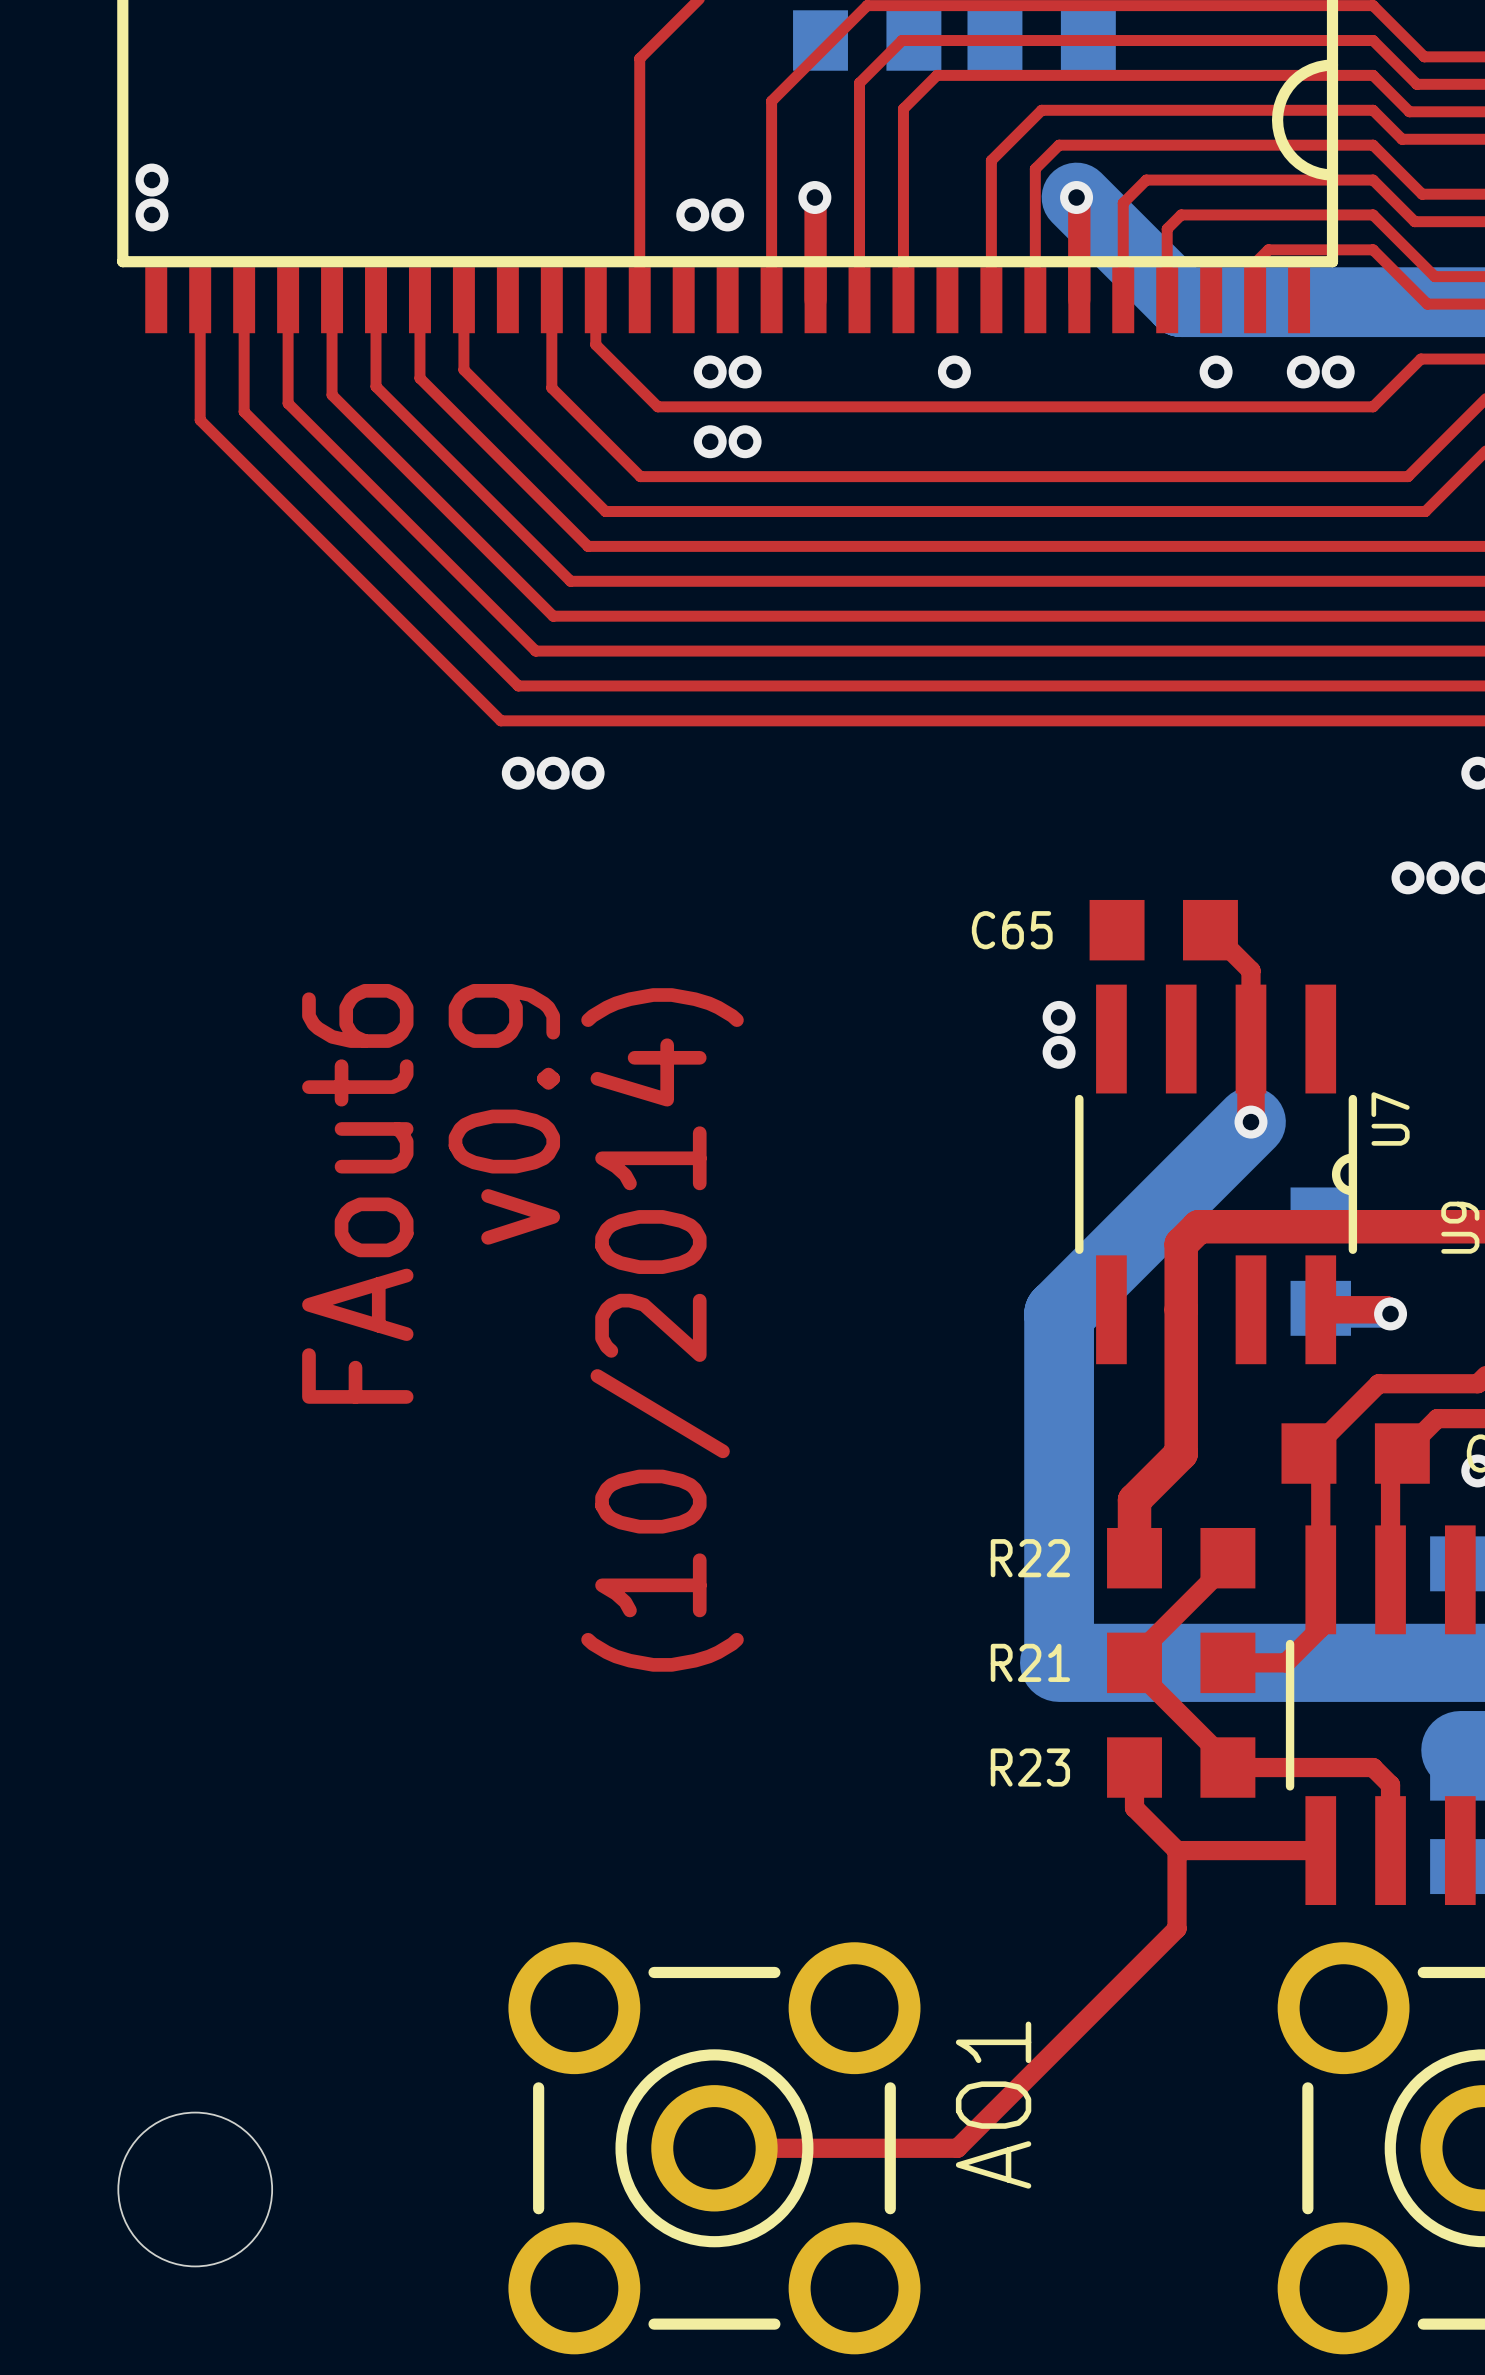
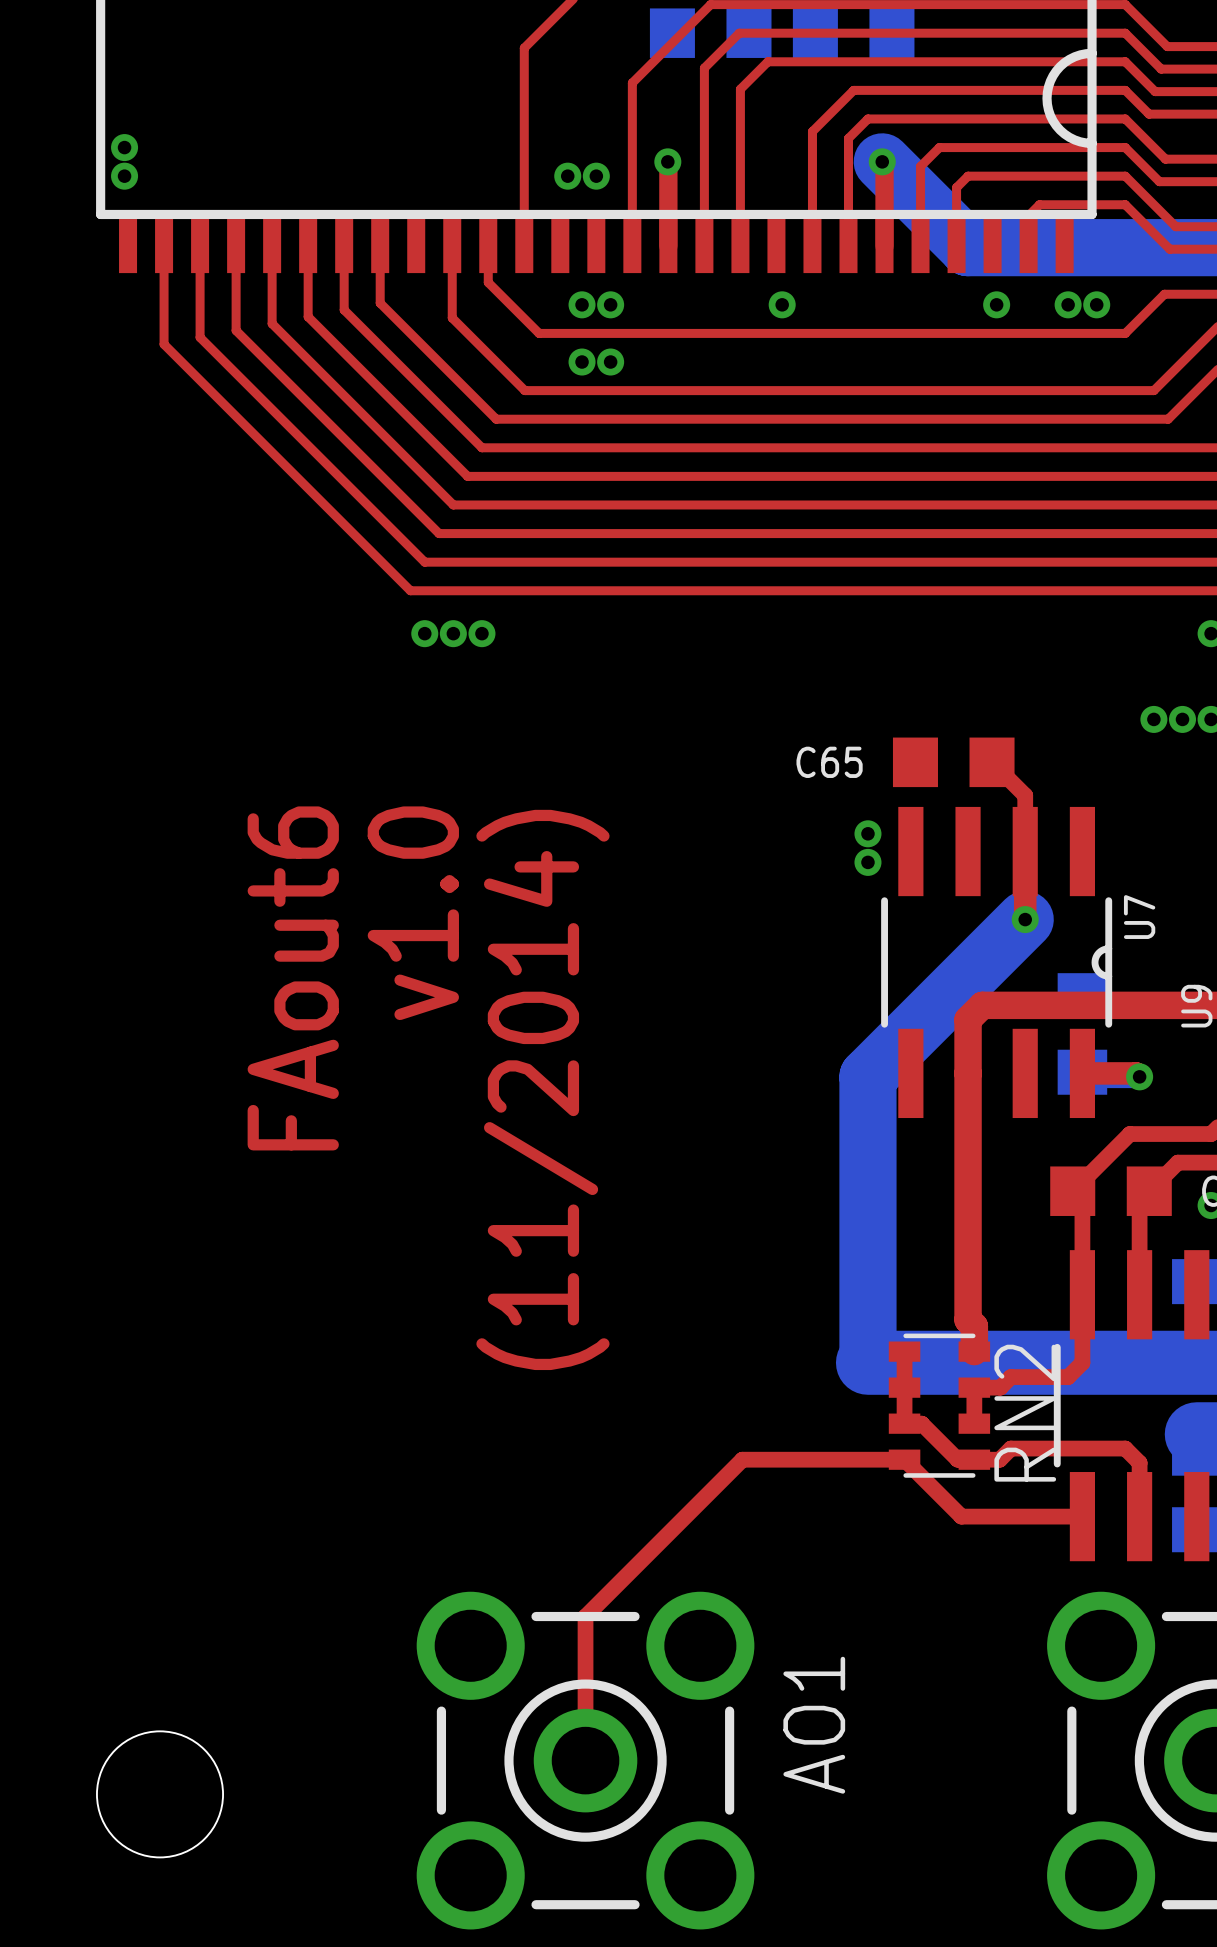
text: v0.9 (504, 1114) -> v1.0 (413, 913)
text: (10/2014) (662, 1329) -> (11/2014) (542, 1089)
top track: (1181, 1453) (1134, 1500) (1134, 1558) -> (968, 1191) (968, 1319) (974, 1326) (974, 1351)
R22: (1181, 1558) -> none
top track: (1227, 1558) (1227, 1563) (1134, 1657) (1134, 1668) (1227, 1761) (1227, 1767) (1233, 1767) -> (904, 1351) (904, 1423) (921, 1423) (957, 1459) (999, 1459) (1010, 1448)
top track: (1320, 1627) (1285, 1662) (1227, 1662) -> (1082, 1334) (1082, 1362) (1068, 1377) (1010, 1377) (1000, 1387) (974, 1387) (974, 1423)
R21: (1181, 1662) -> none
RN2: none -> (939, 1405)
top track: (1134, 1767) (1134, 1808) (1177, 1850) (1177, 1928) (957, 2148) (714, 2148) -> (964, 1516) (961, 1516) (904, 1459) (742, 1459) (585, 1616) (585, 1760)
R23: (1181, 1767) -> none

